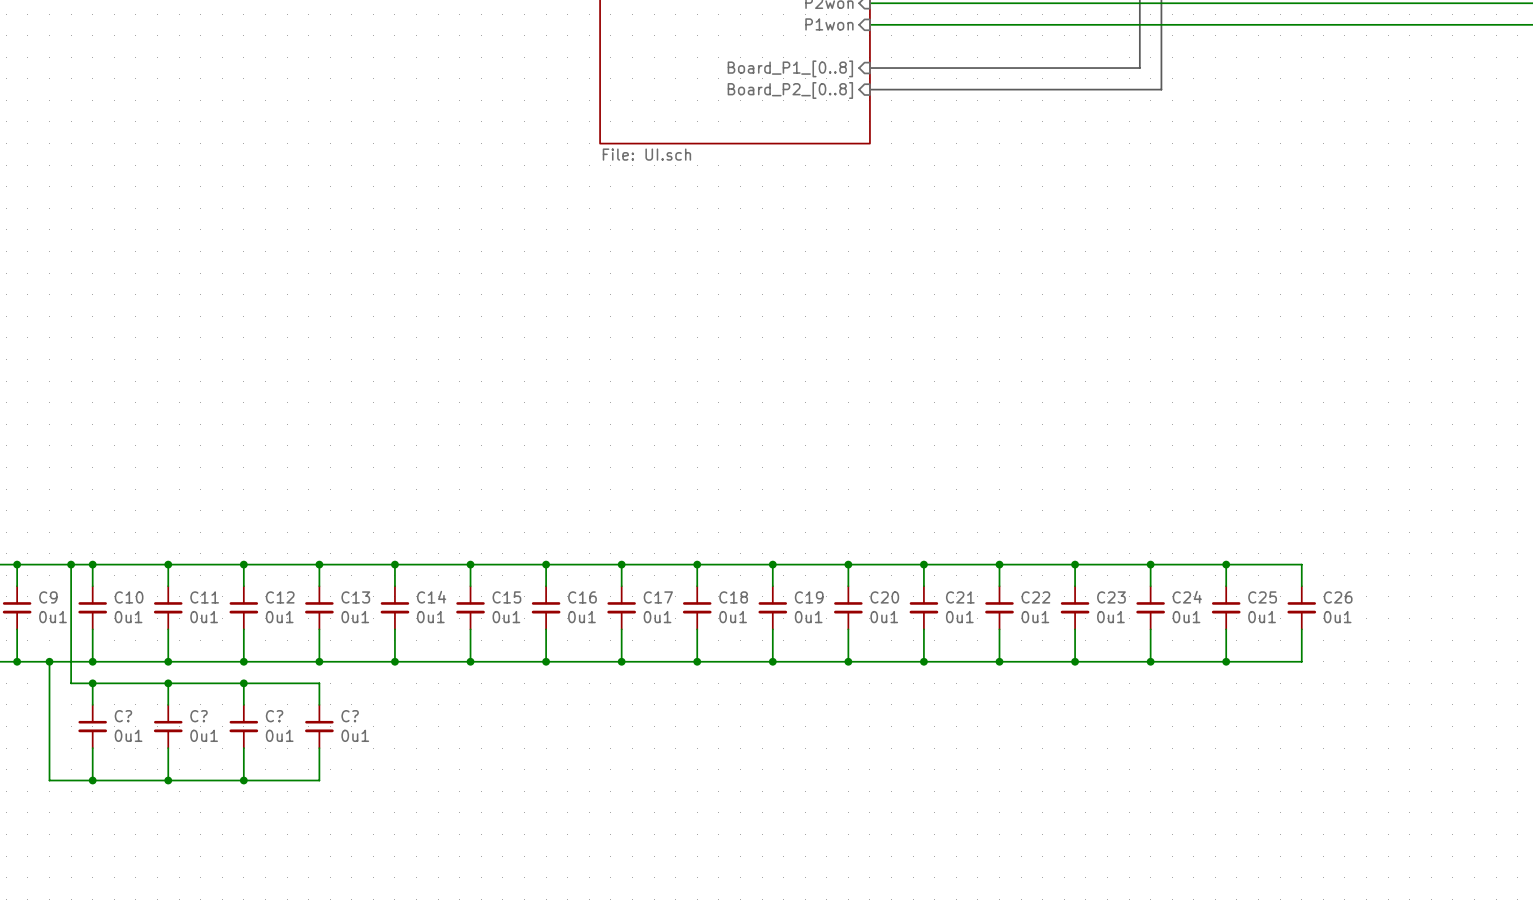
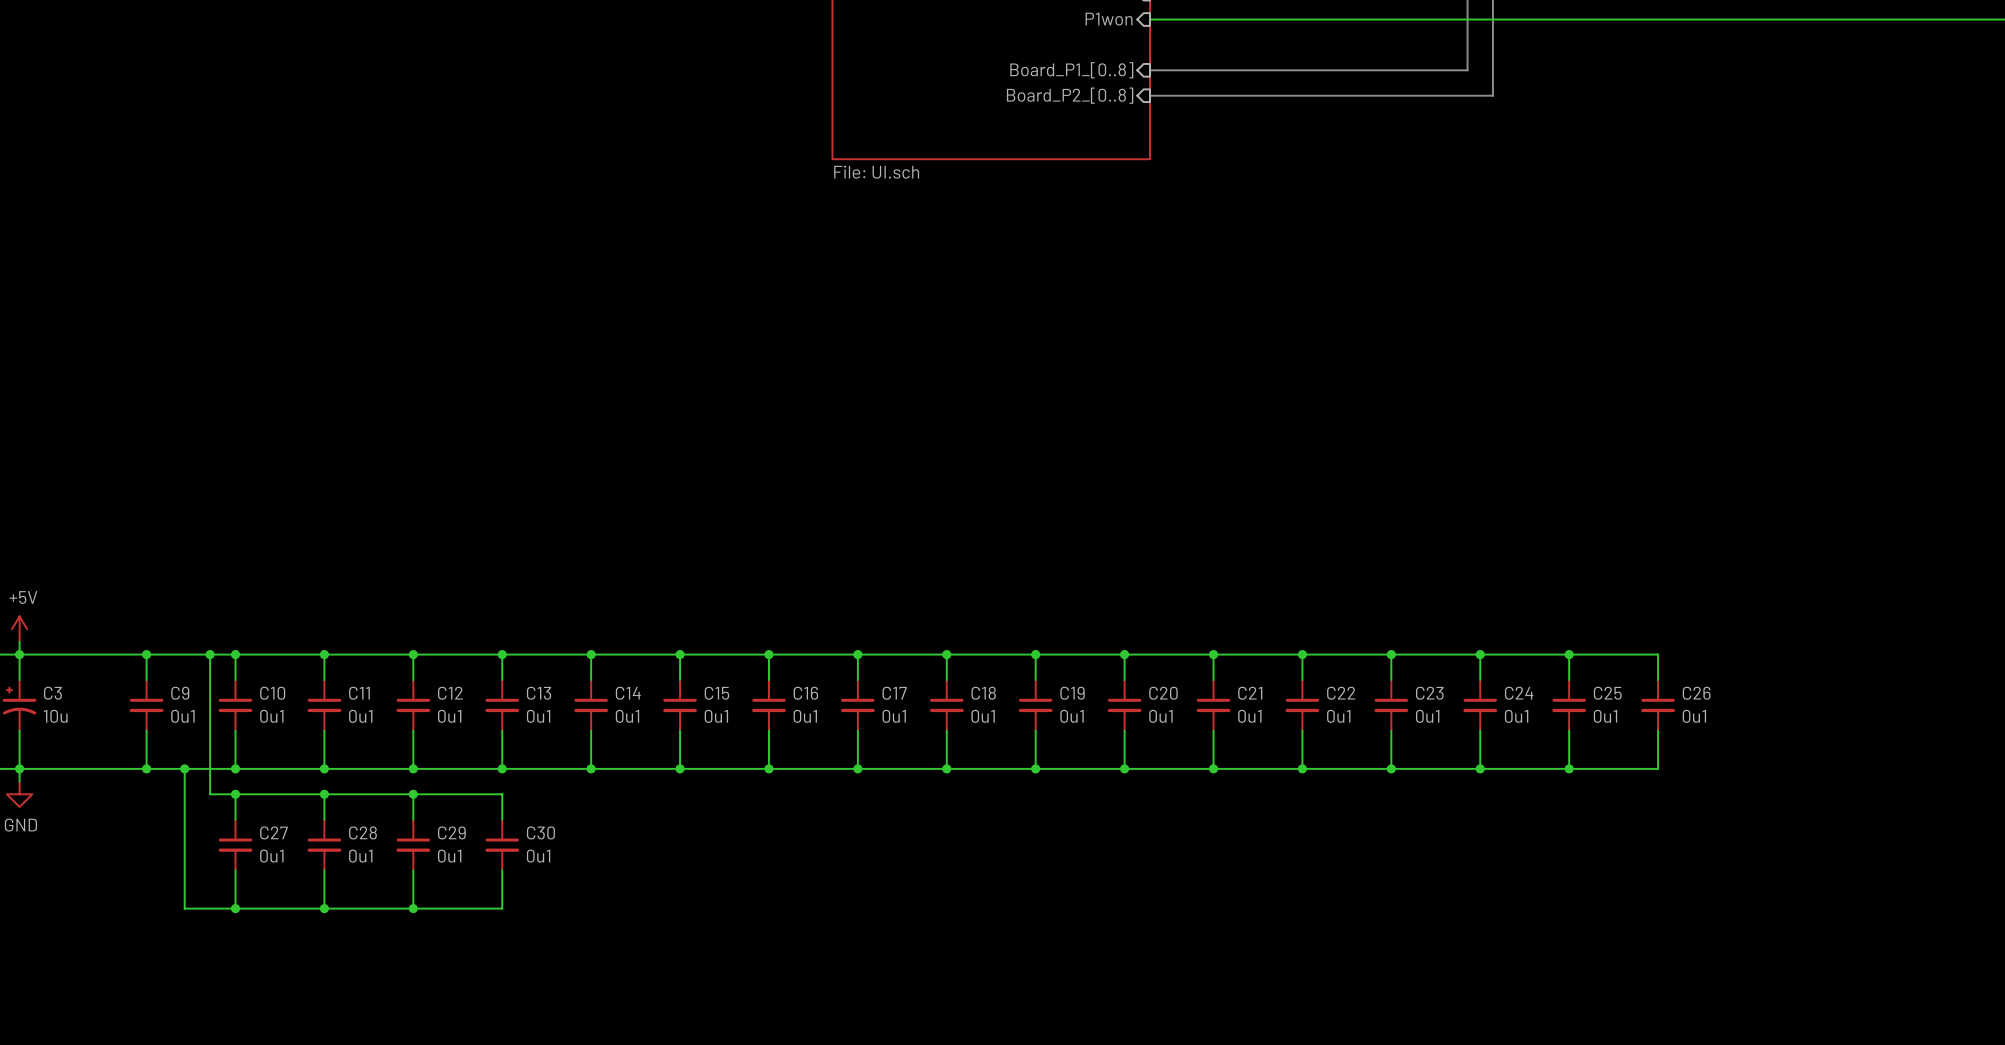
C? name: C? (123, 716) -> C27 (273, 832)
C? name: C? (199, 716) -> C28 (362, 832)
C? name: C? (274, 716) -> C29 (451, 832)
C? name: C? (350, 716) -> C30 (540, 832)

